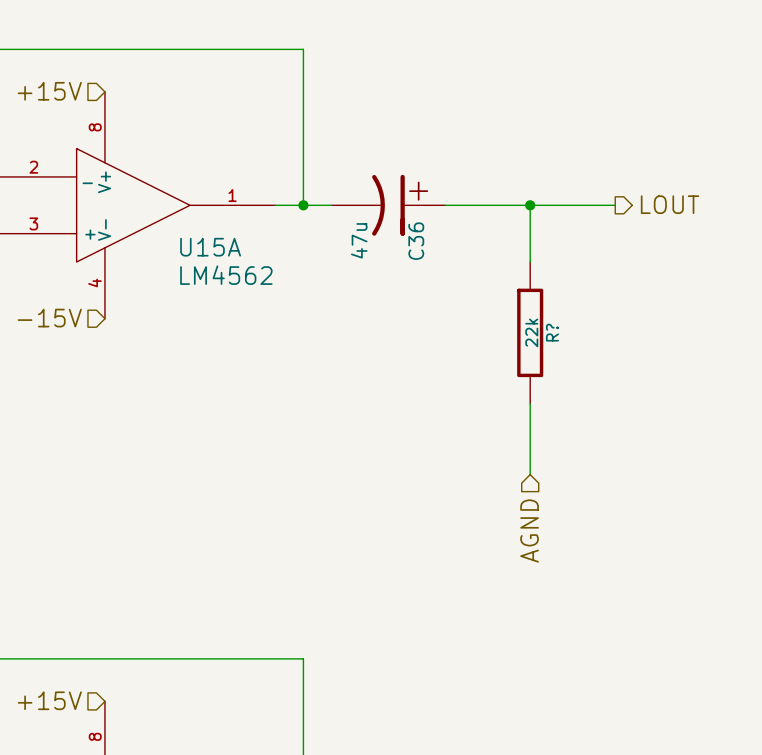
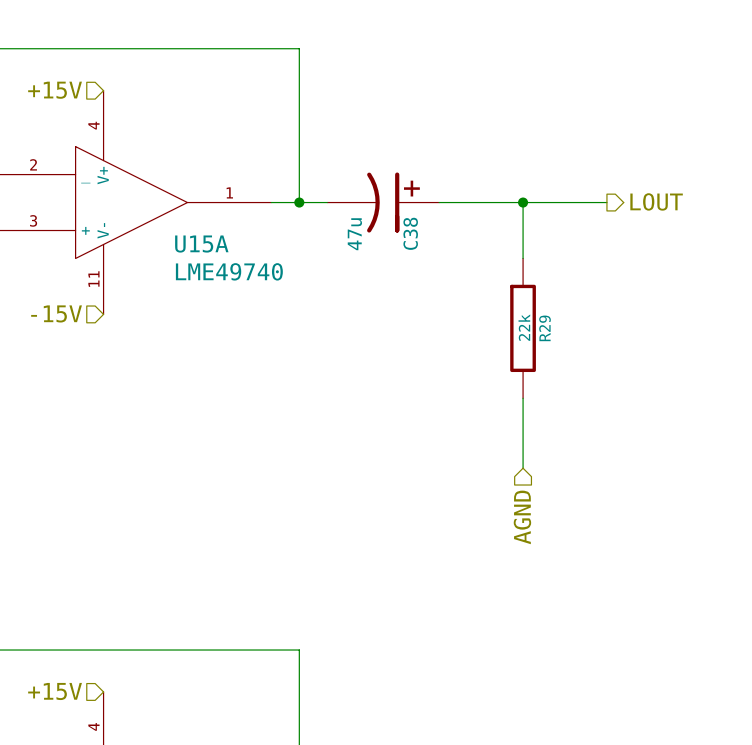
U15A pin number: 8 (95, 127) -> 4 (93, 125)
C36 name: C36 (416, 241) -> C38 (410, 233)
U15A value: LM4562 (226, 275) -> LME49740 (229, 271)
U15A pin number: 4 (94, 283) -> 11 (93, 279)
R? name: R? (552, 332) -> R29 (545, 328)
part pin number: 8 (95, 736) -> 4 (93, 726)

